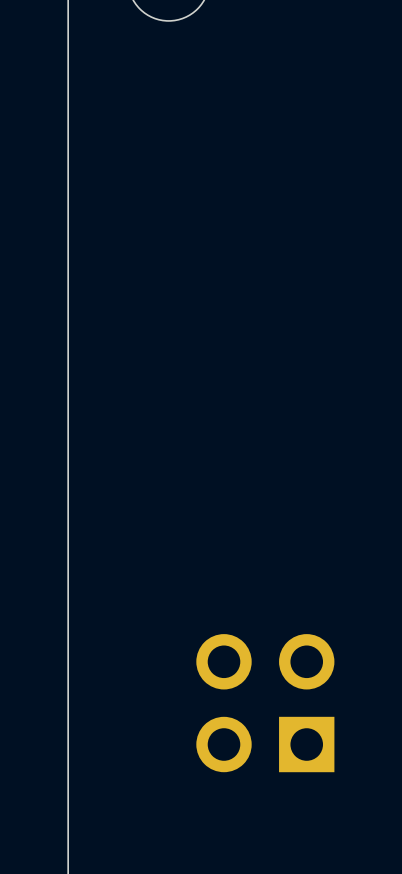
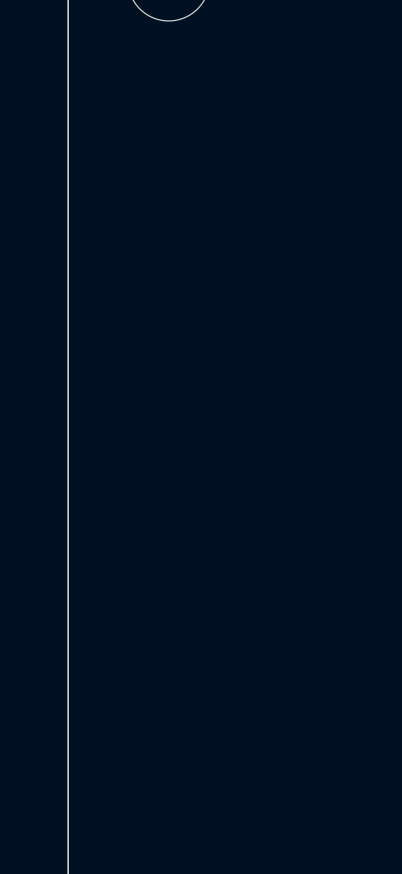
part: (265, 703) -> none

